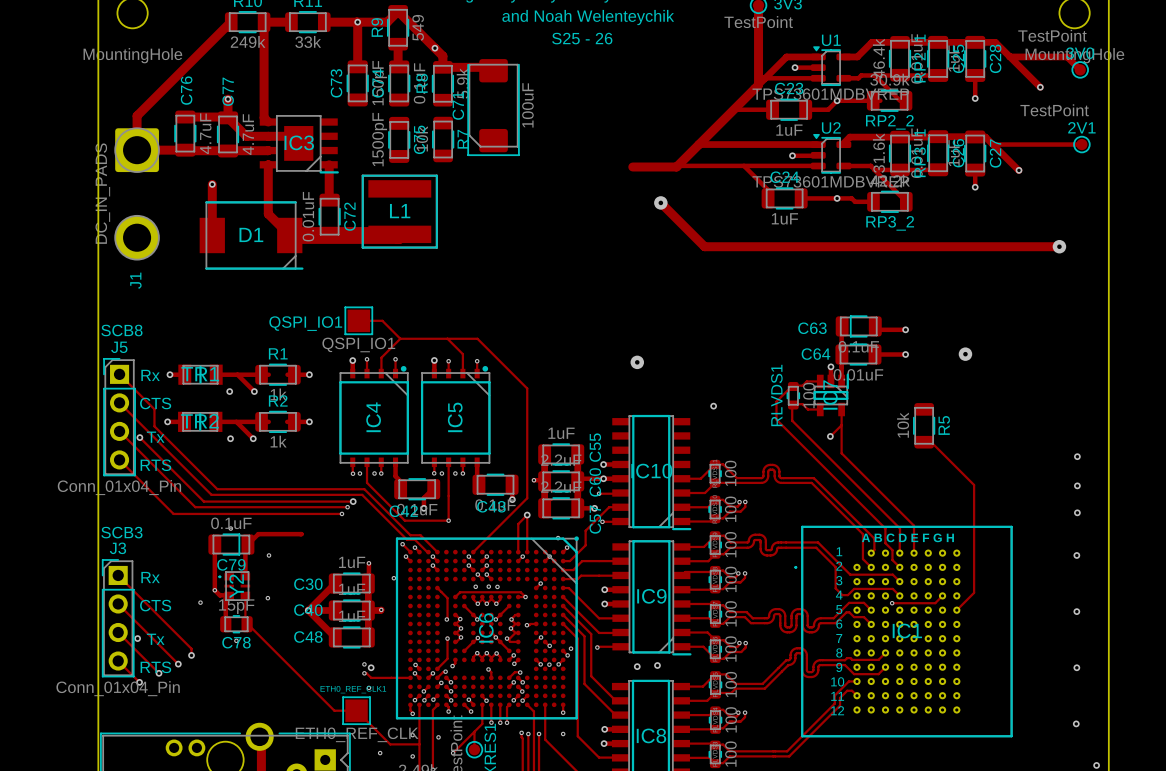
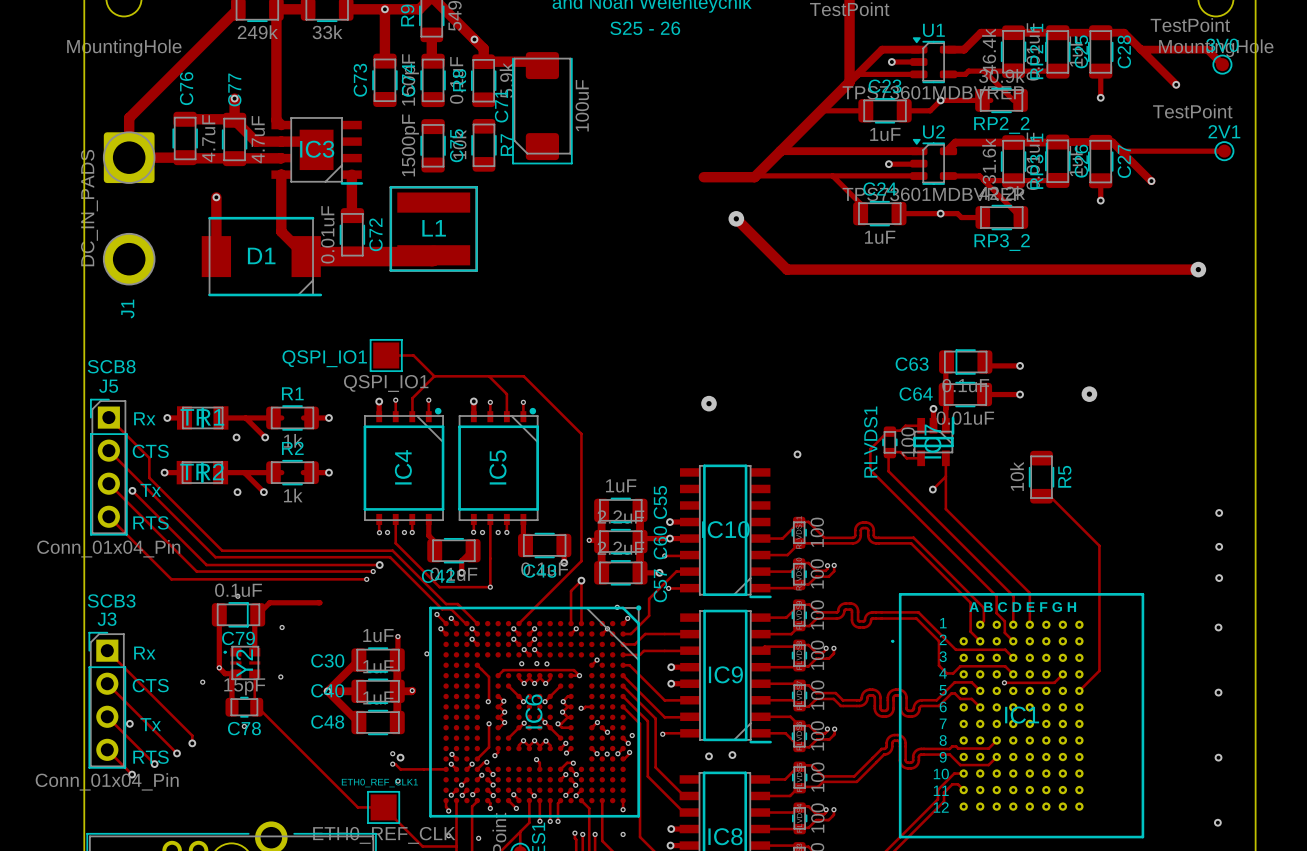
track: none -> (629, 752) (624, 758)
via: none -> (629, 752)

